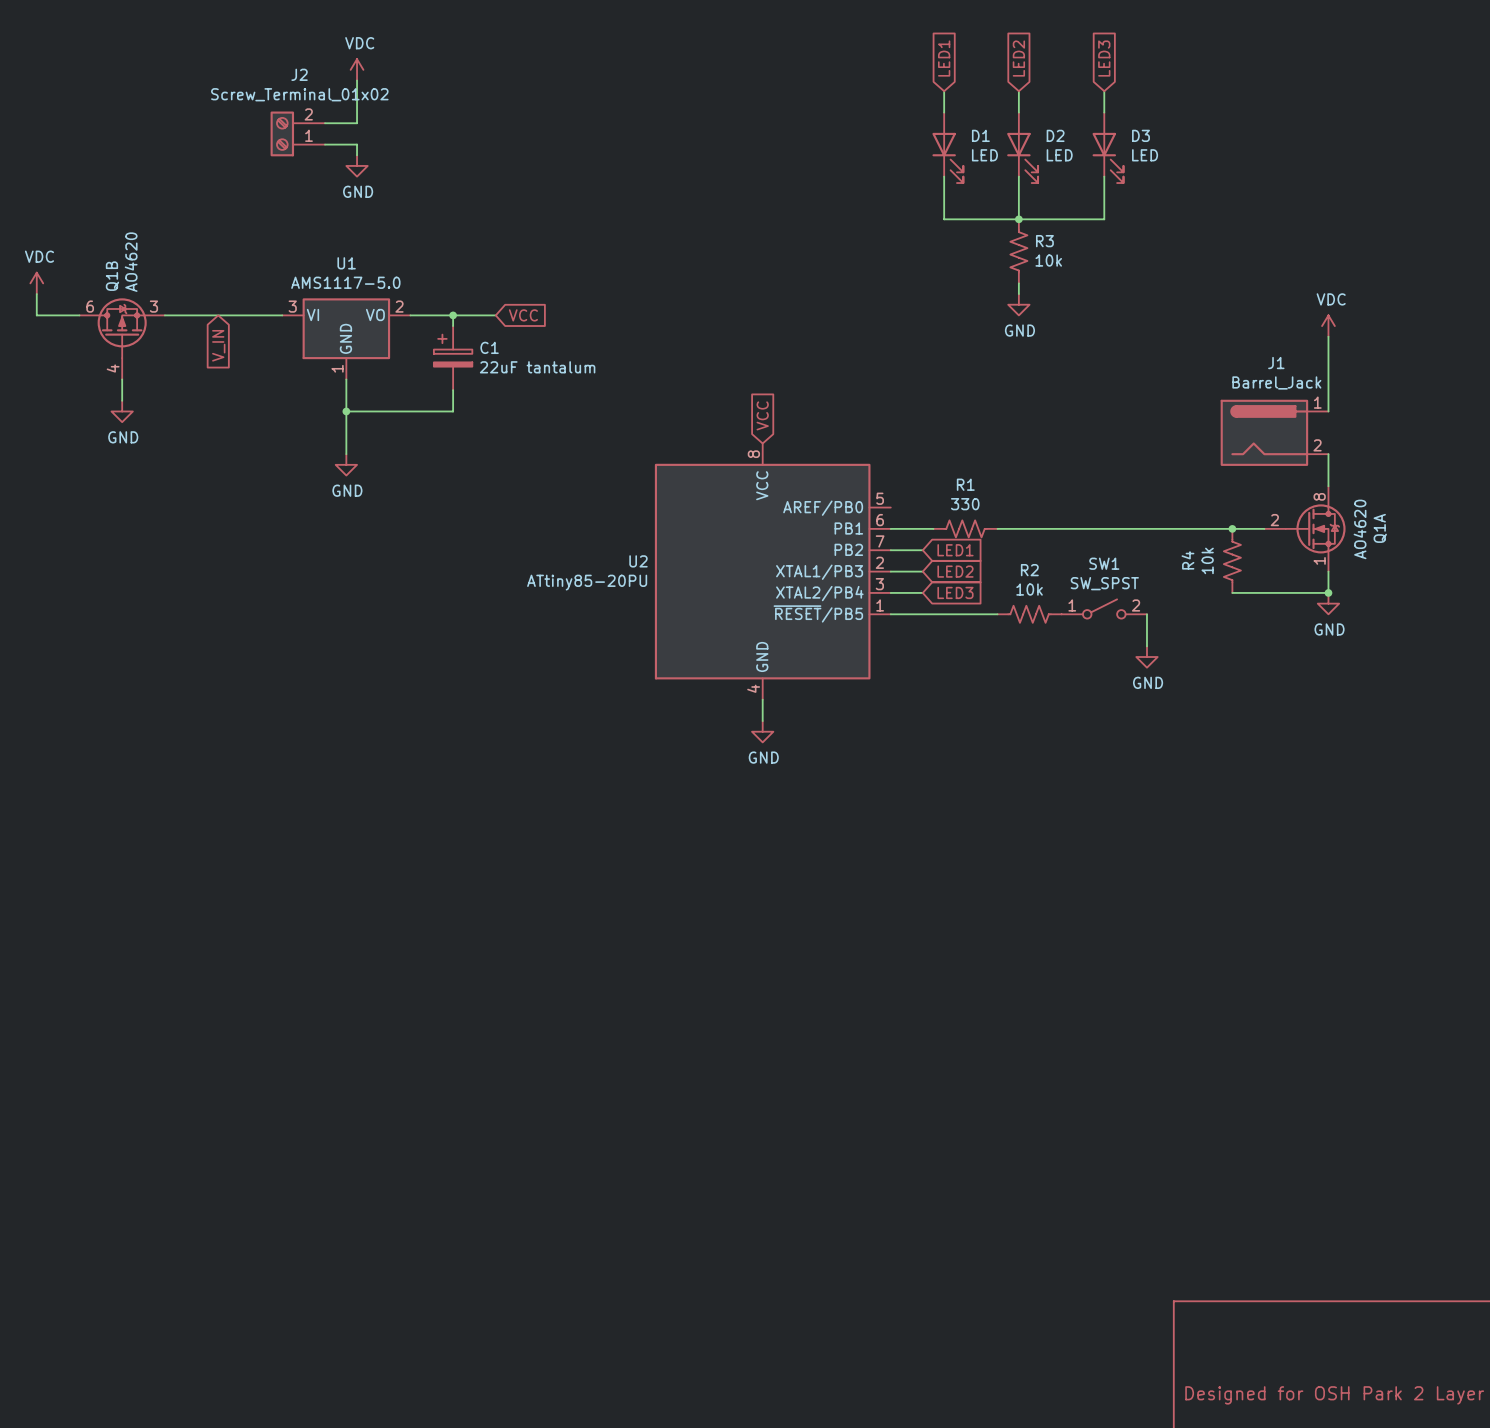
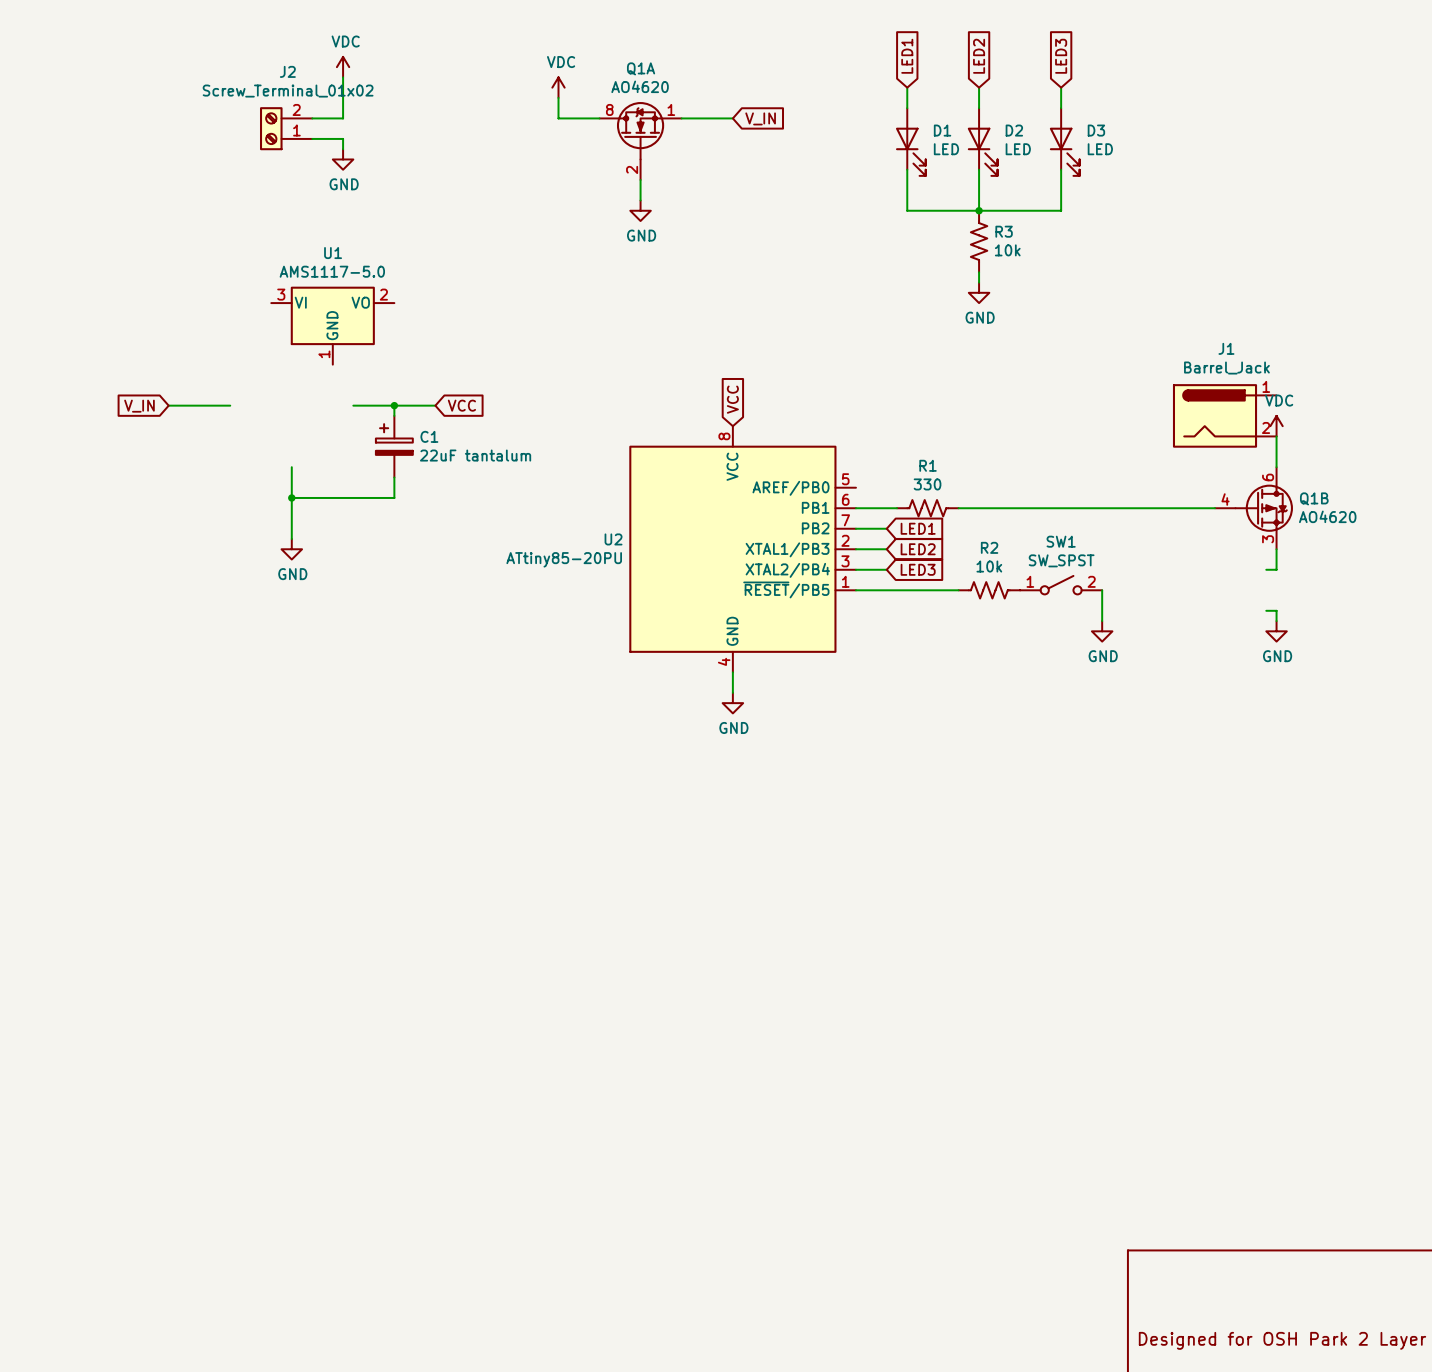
power symbol: none -> VDC (558, 87)
wire: none -> (558, 97) (558, 118) (599, 118)
wire: none -> (681, 118) (732, 118)
global label: none -> V_IN (760, 118)
wire: none -> (640, 179) (640, 200)
power symbol: none -> GND (640, 210)
power symbol: VDC (36, 283) -> none
wire: (36, 294) (36, 315) (79, 315) -> none
wire: (164, 315) (282, 315) -> none
wire: (410, 315) (495, 315) -> (353, 405) (435, 405)
wire: (453, 315) (453, 326) -> (394, 405) (394, 415)
junction: (453, 315) -> none
global label position: VCC (523, 315) -> VCC (461, 405)
power symbol position: VDC (1328, 326) -> VDC (1276, 426)
Q1B rotation: 0° (122, 328) -> 90° clockwise (1264, 508)
wire: (1328, 336) (1328, 411) -> none
Q1B position: (122, 338) -> (1253, 508)
global label rotation: 0° (218, 345) -> 90° clockwise (139, 406)
global label position: V_IN (218, 345) -> V_IN (139, 406)
C1 position: (453, 358) -> (394, 446)
wire: (122, 379) (122, 400) -> none
wire: (346, 379) (346, 454) -> (291, 467) (291, 539)
wire: (453, 390) (453, 411) (346, 411) -> (394, 477) (394, 497) (291, 497)
power symbol: GND (122, 411) -> none
junction: (346, 411) -> none
wire: none -> (168, 405) (230, 405)
junction: none -> (394, 405)
power symbol position: GND (346, 464) -> GND (291, 549)
junction: none -> (291, 497)
junction: (1232, 528) -> none
Q1A position: (1304, 528) -> (640, 141)
Q1A rotation: 0° (1315, 528) -> 90° counterclockwise (640, 130)
R4: 10k (1232, 560) -> none
wire: (1232, 592) (1317, 592) -> none
junction: (1328, 592) -> none
power symbol position: GND (1328, 603) -> GND (1276, 631)
wire: none -> (1266, 610) (1276, 610) (1276, 621)

